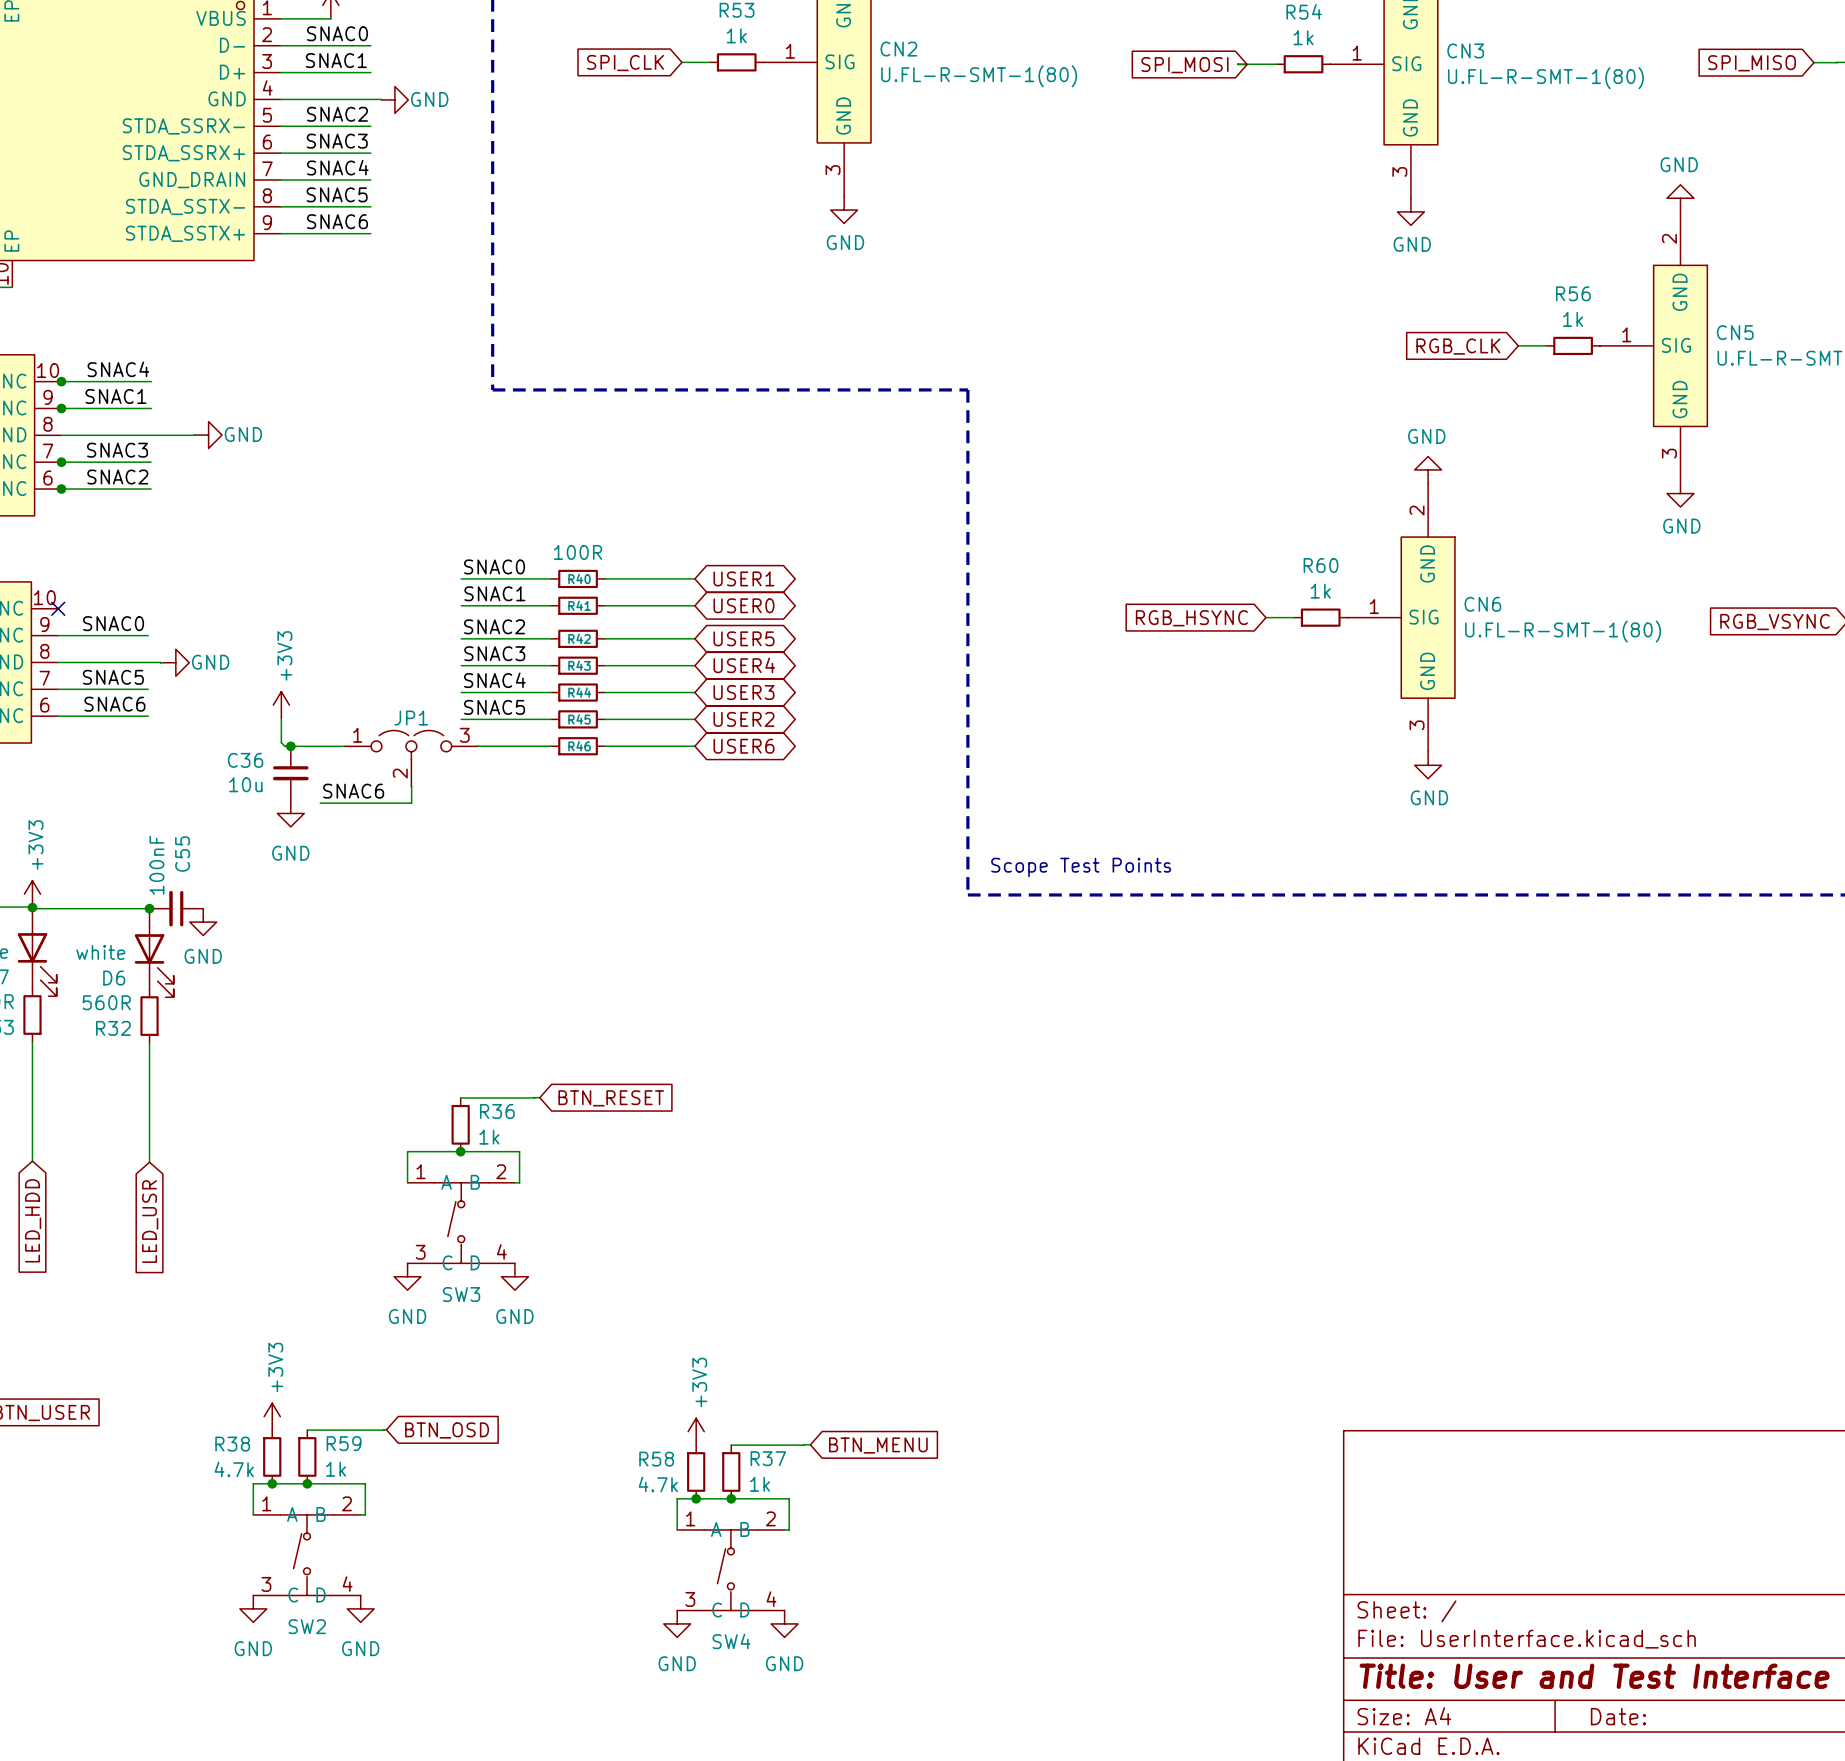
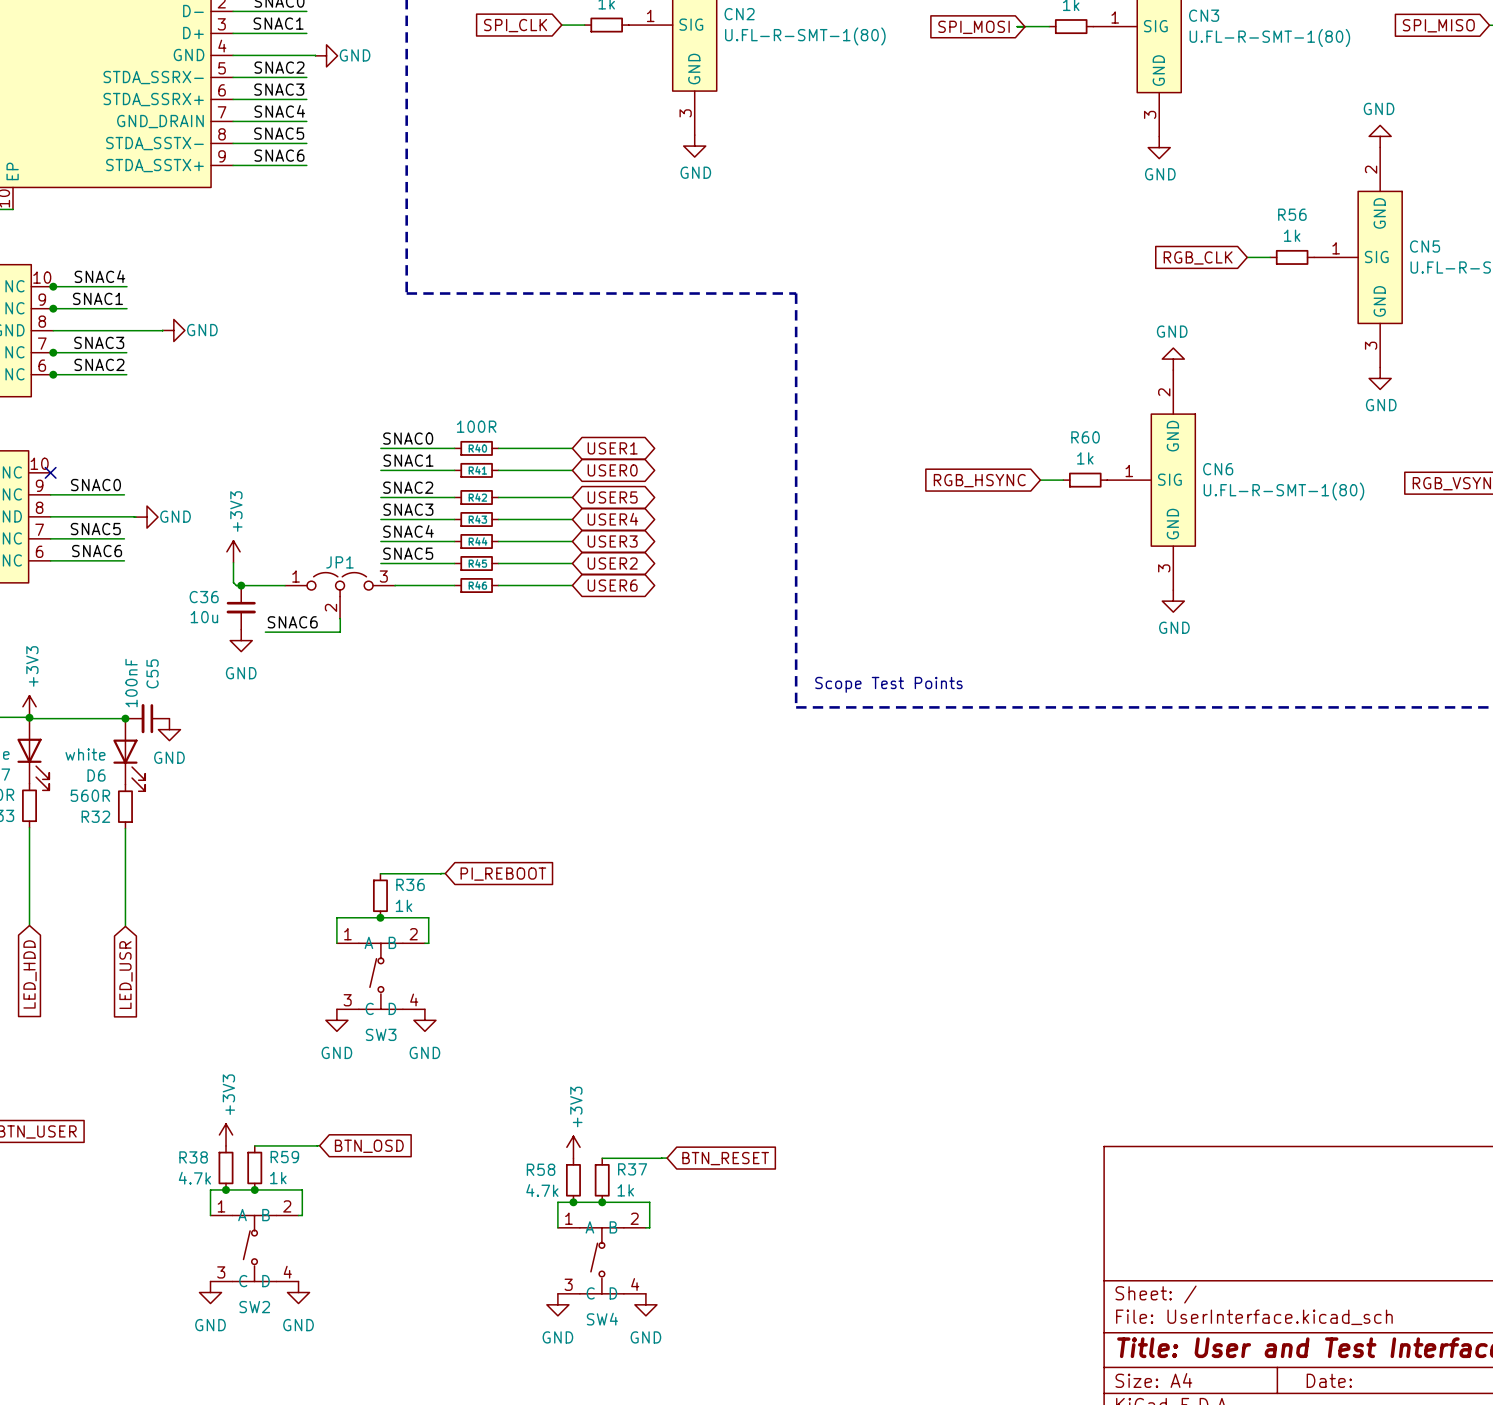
global label: BTN_RESET (611, 1098) -> PI_REBOOT (503, 874)
global label: BTN_MENU (878, 1445) -> BTN_RESET (725, 1158)

